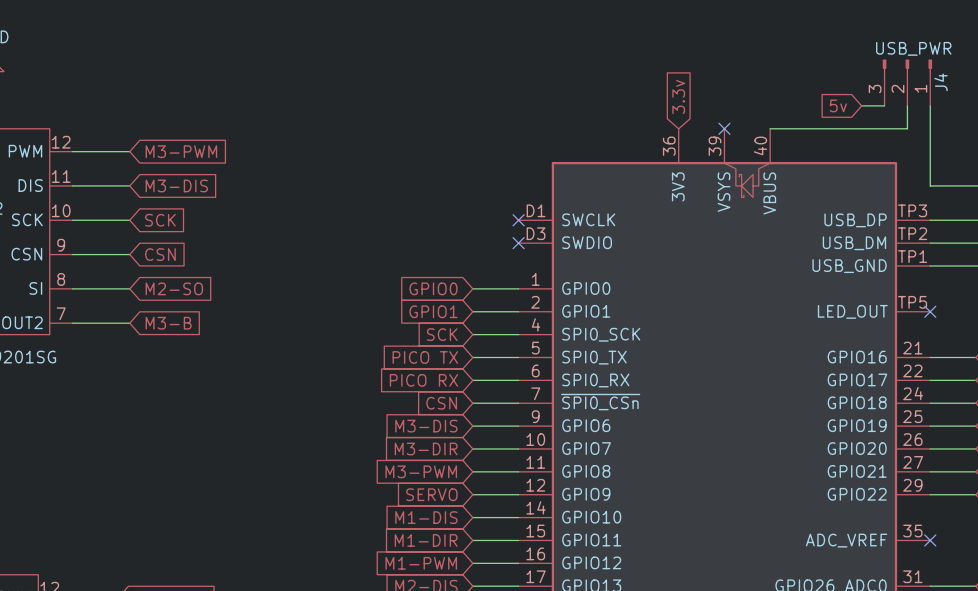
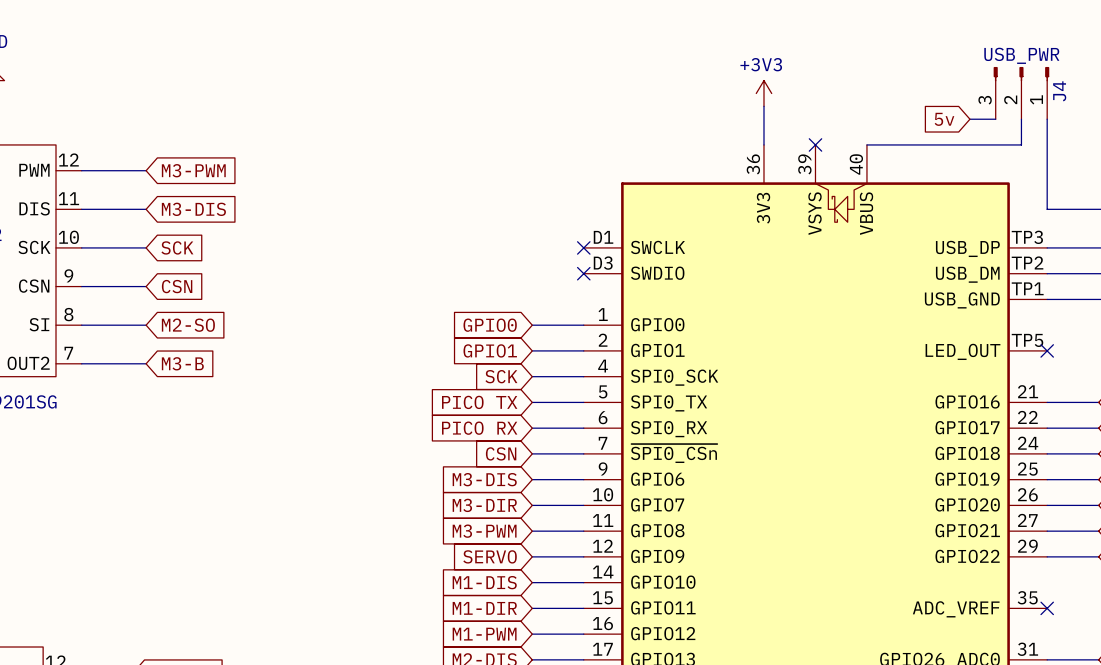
power symbol: none -> +3V3 (763, 93)
wire: none -> (763, 106) (763, 144)
global label: 3.3v (678, 97) -> none

